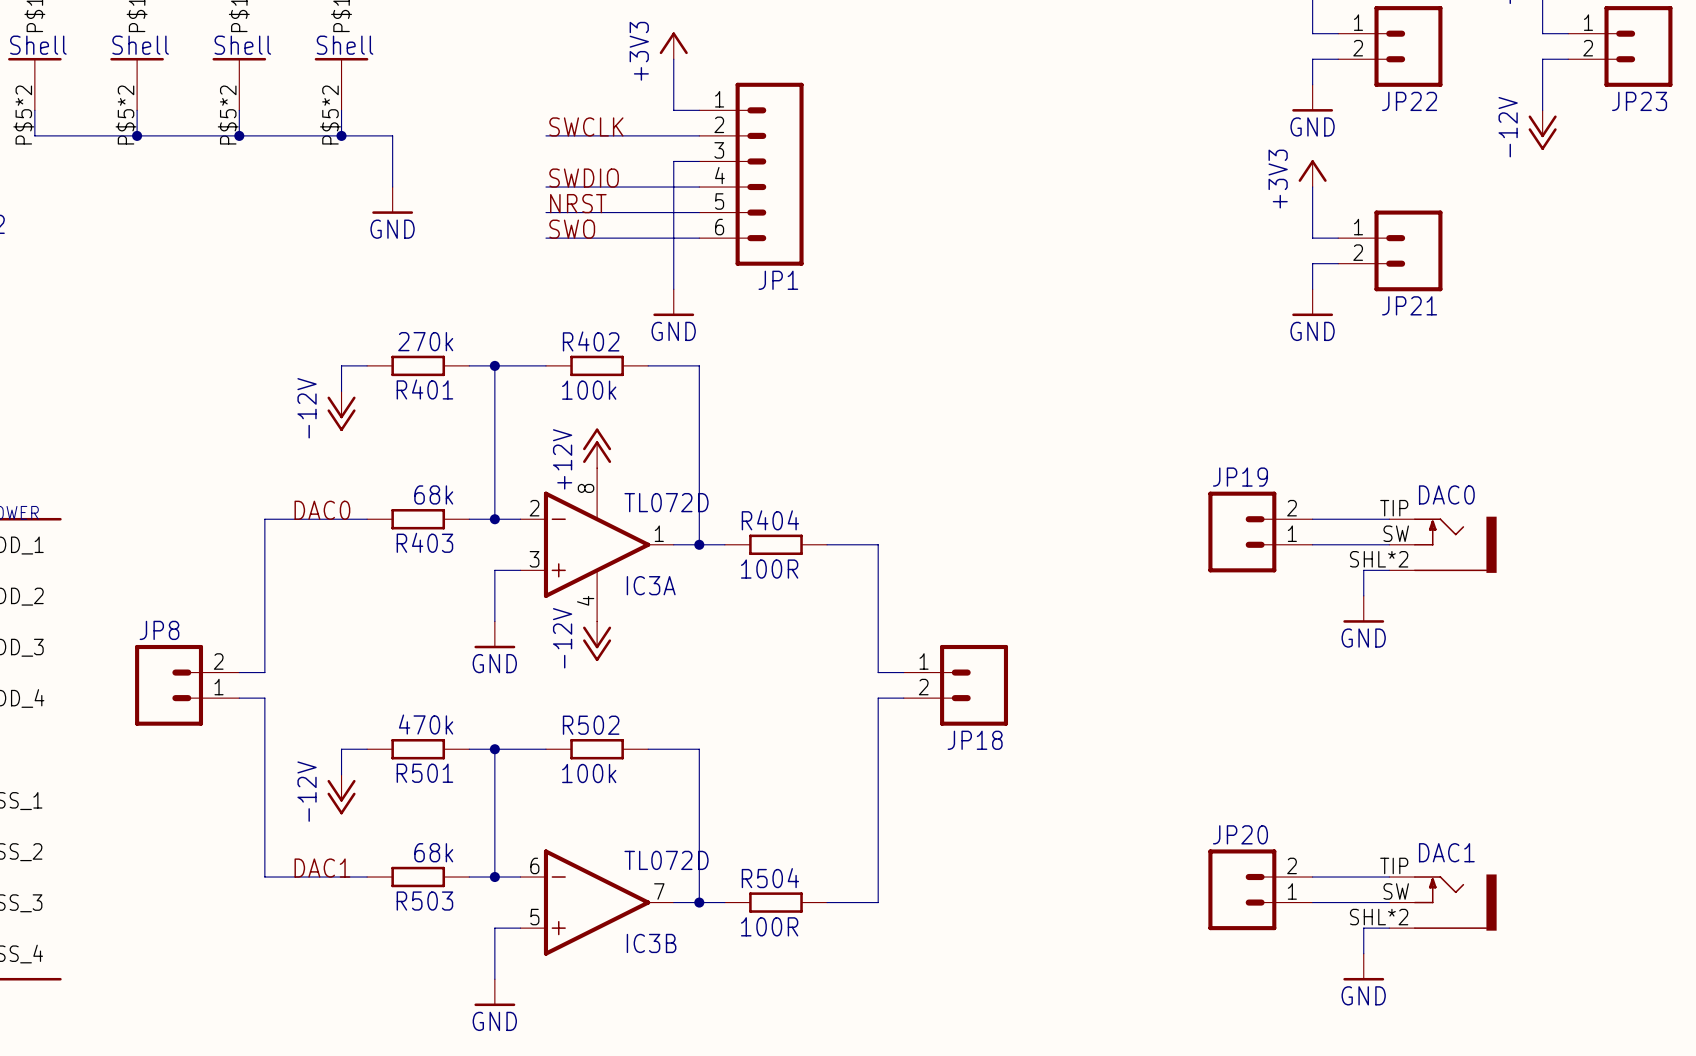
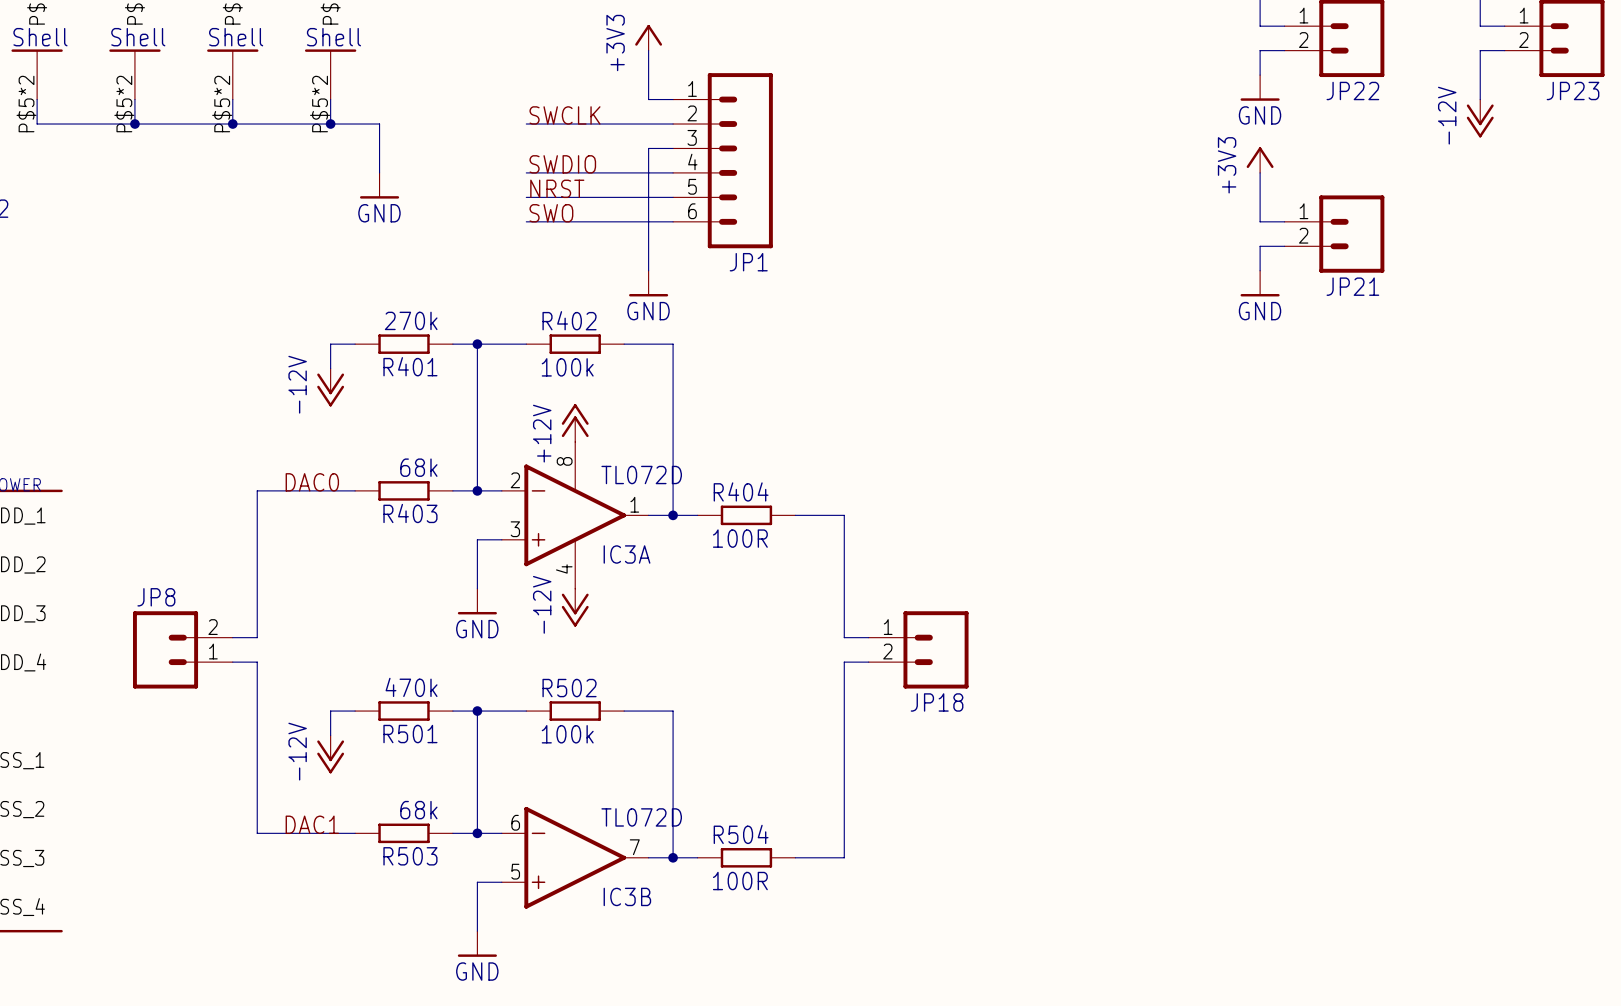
wire: (1312, 519) (1389, 519) -> none
JP19: (1260, 532) -> none
wire: (1312, 544) (1389, 544) -> none
DAC0: (1442, 544) -> none
wire: (1389, 570) (1363, 570) (1363, 595) -> none
power symbol: GND (1363, 609) -> none
wire: (1312, 877) (1389, 877) -> none
JP20: (1260, 889) -> none
wire: (1312, 902) (1389, 902) -> none
DAC1: (1442, 902) -> none
wire: (1389, 928) (1363, 928) (1363, 953) -> none
power symbol: GND (1363, 967) -> none

